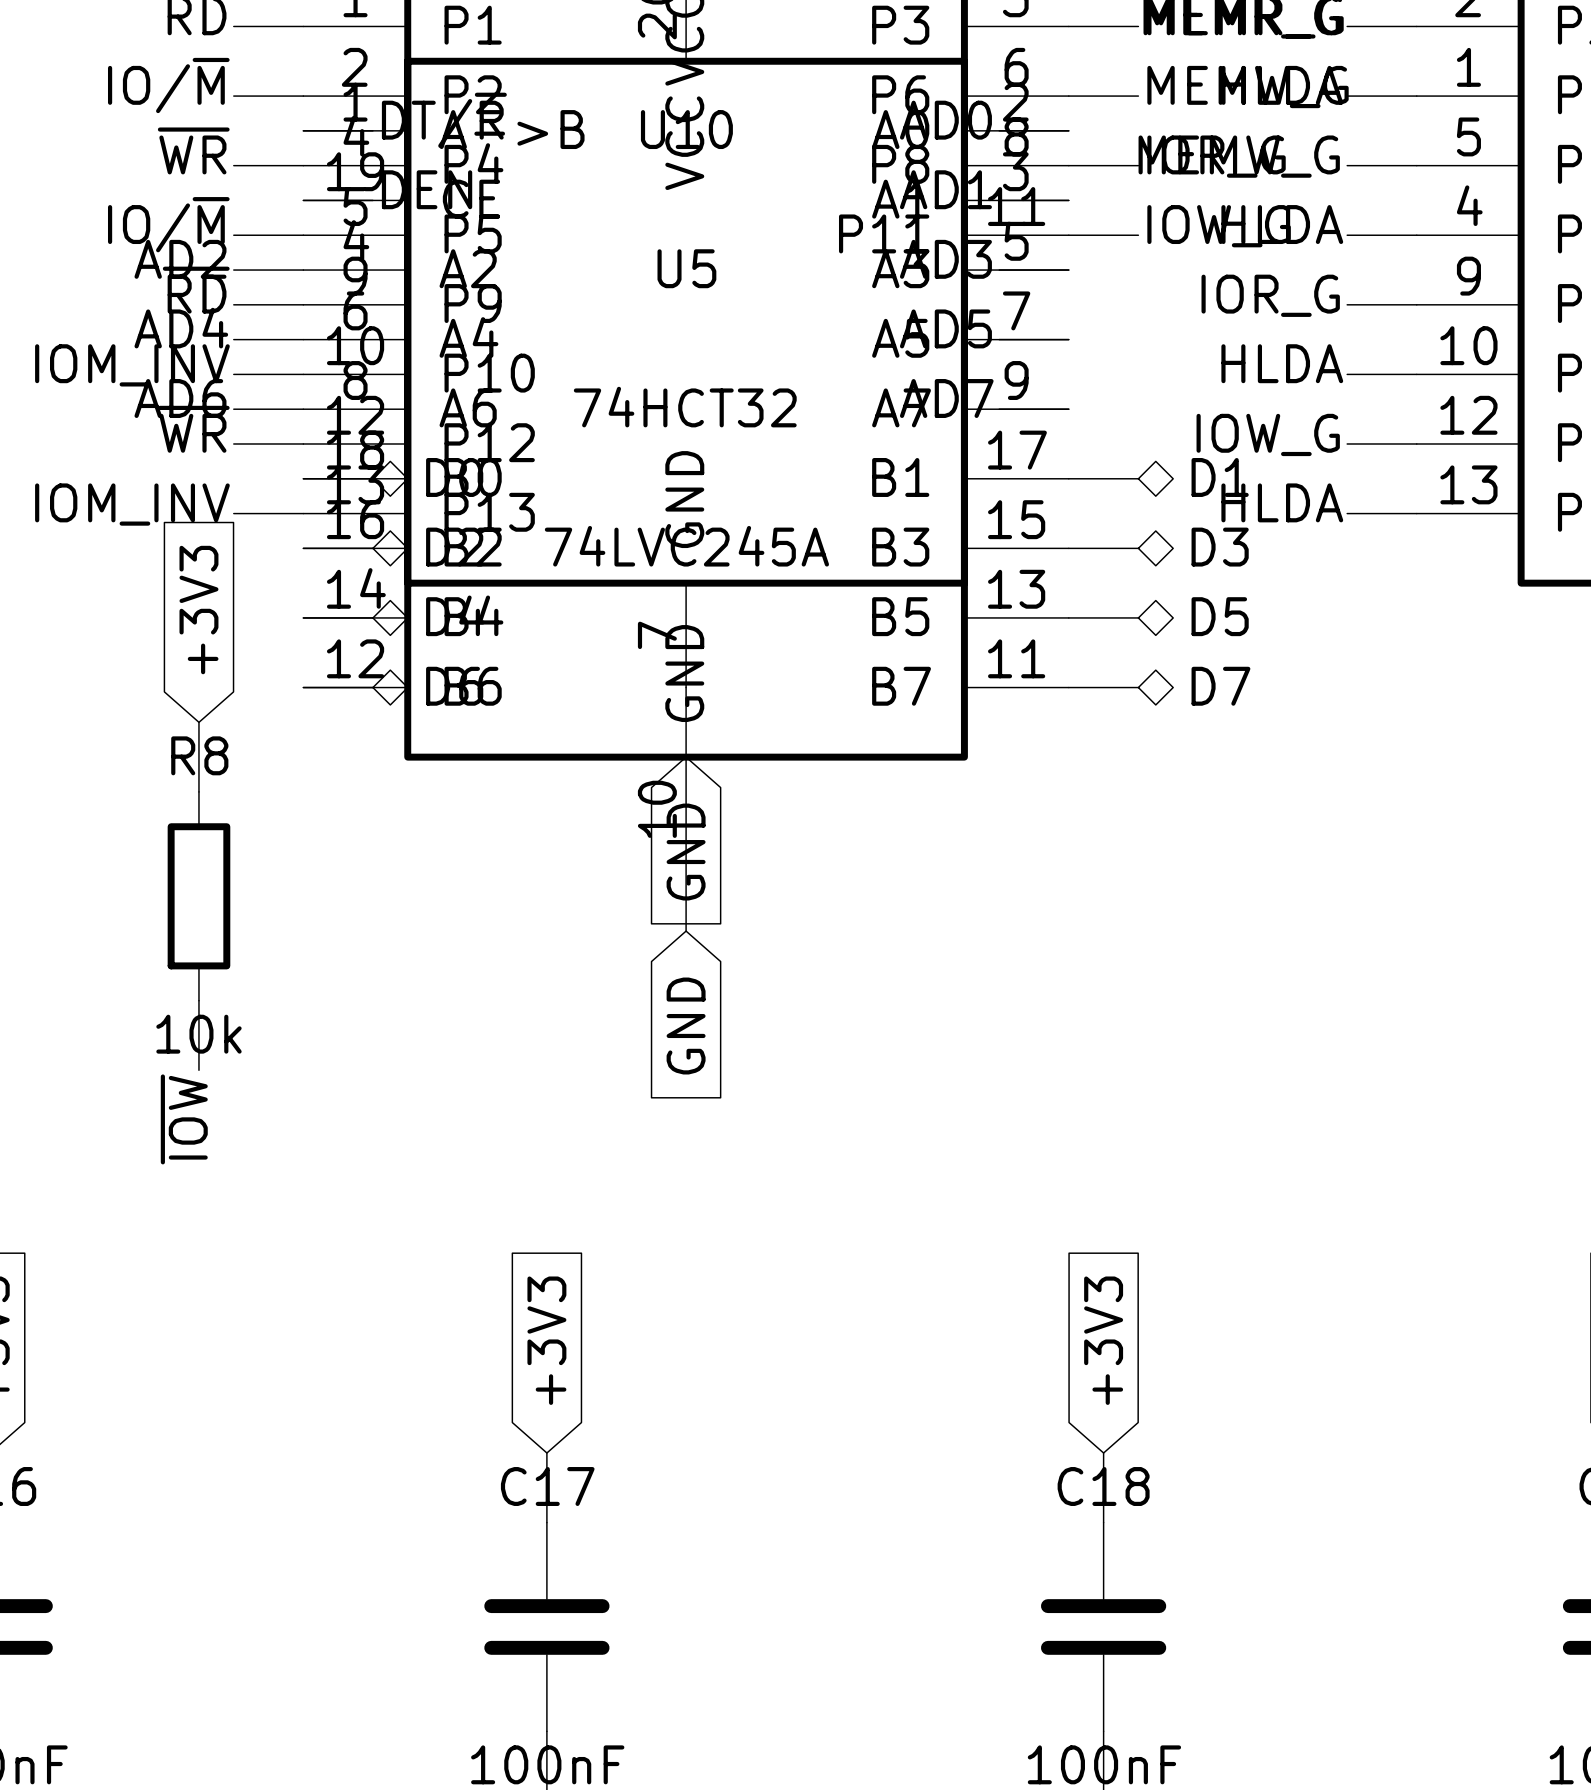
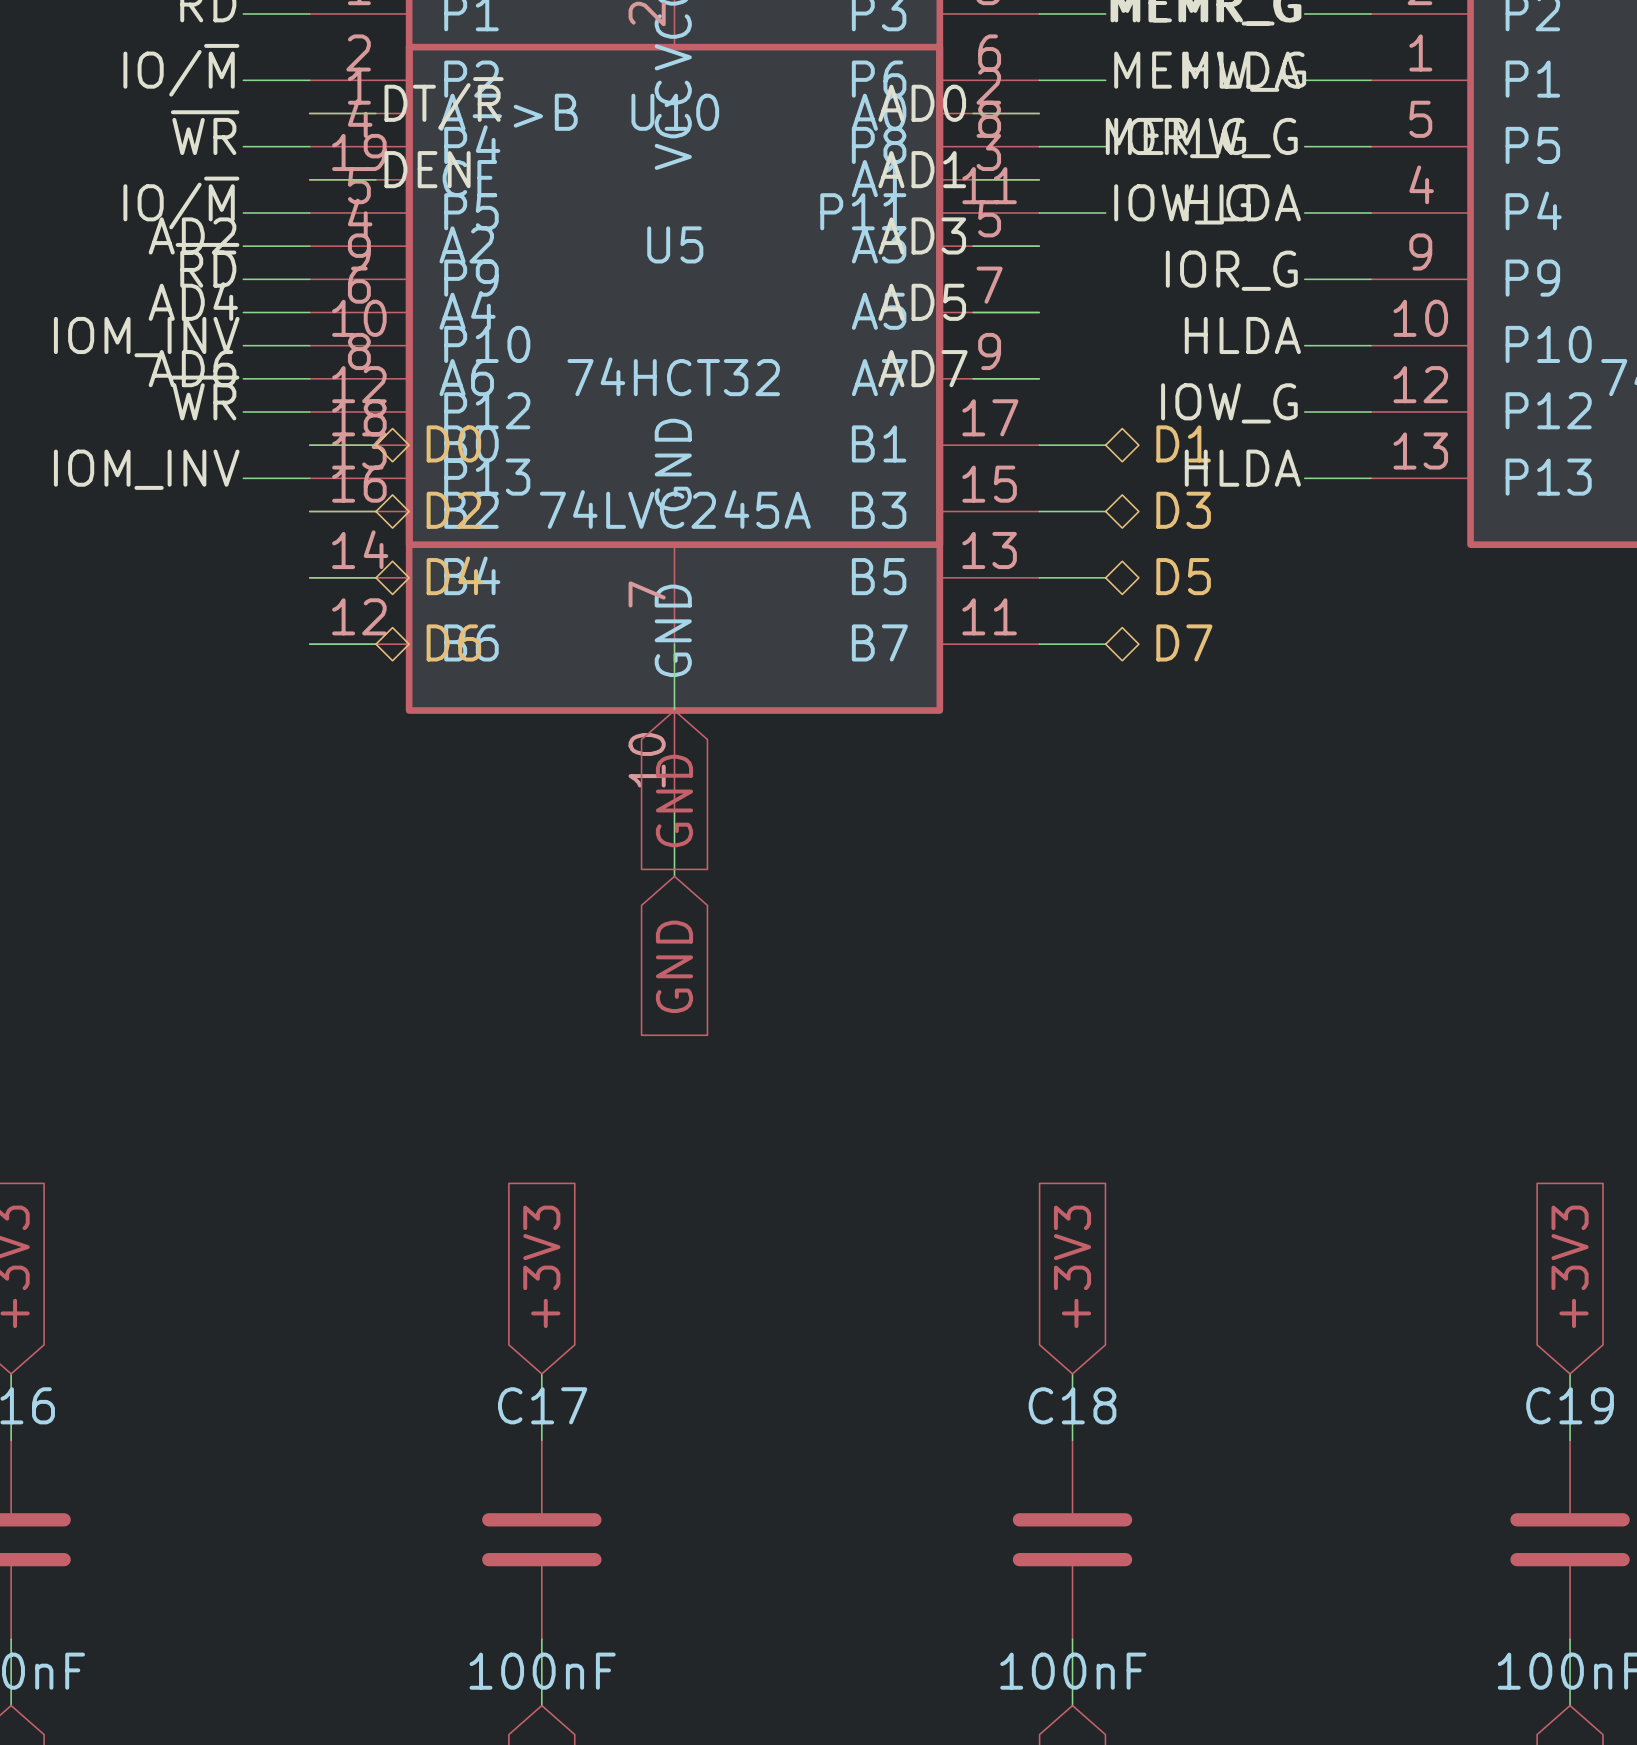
global label: +3V3 (198, 610) -> none
wire: (198, 722) (198, 791) -> none
R8: 10k (198, 896) -> none
wire: (198, 1000) (198, 1070) -> none
label: ~{IOW} (184, 1119) -> none

